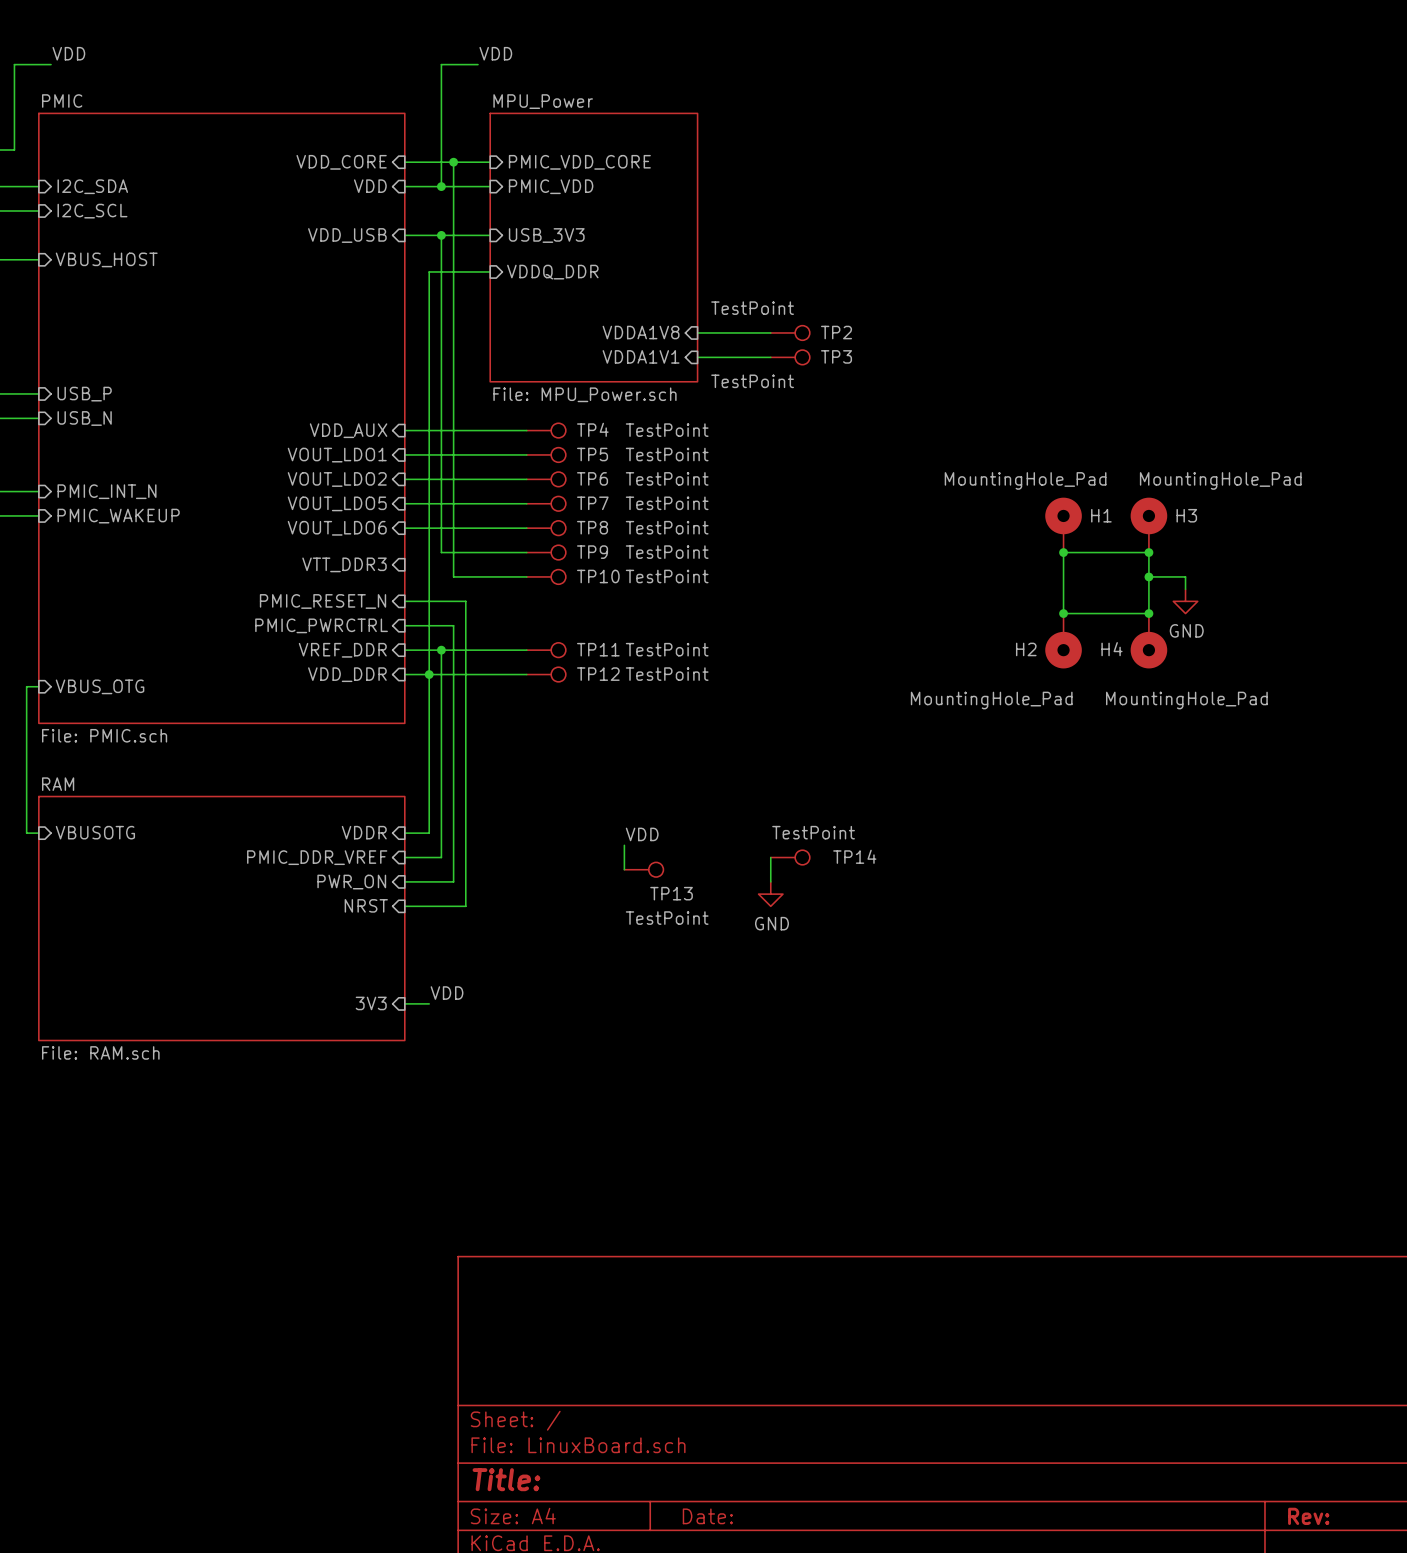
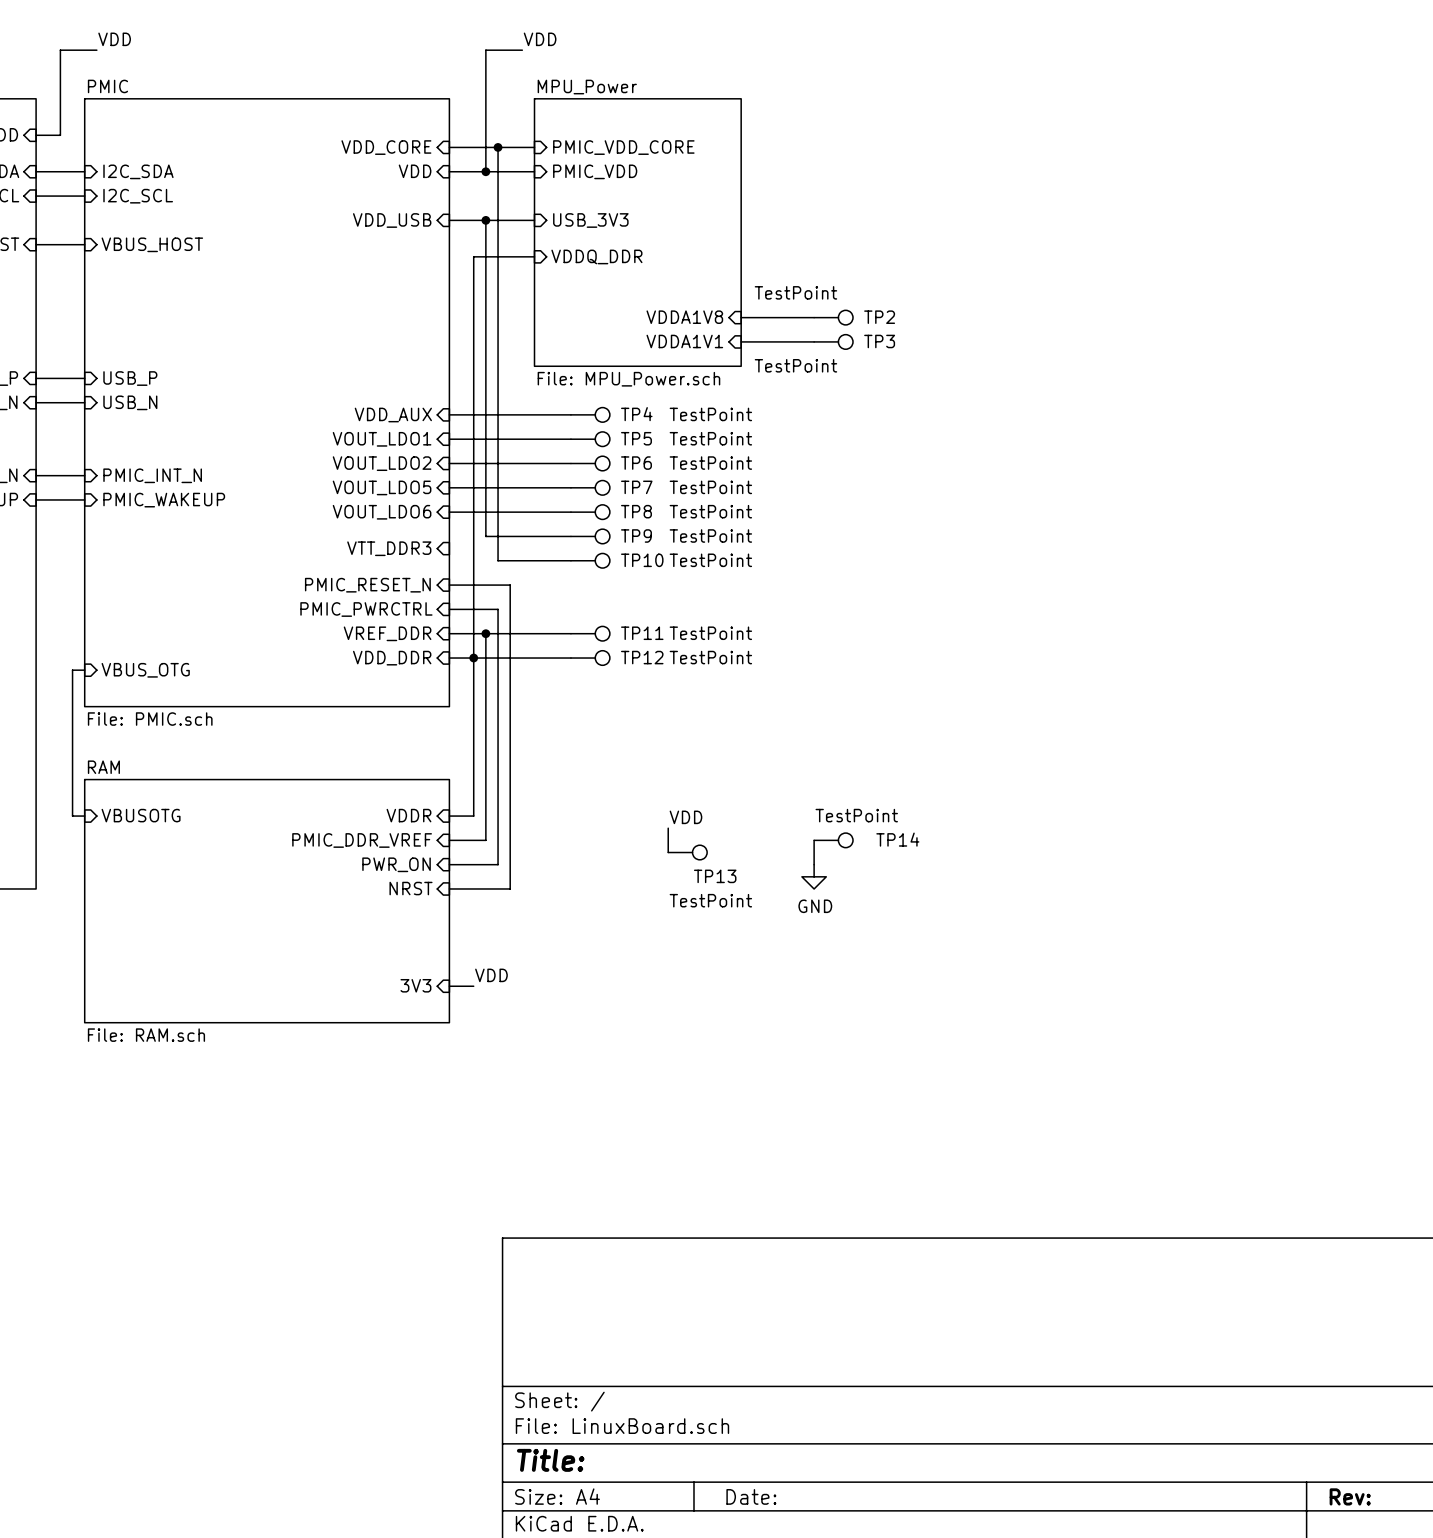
H1: MountingHole_Pad (1063, 525) -> none
H3: MountingHole_Pad (1148, 525) -> none
wire: (1063, 552) (1148, 552) (1148, 613) (1063, 613) (1063, 552) -> none
junction: (1063, 552) -> none
junction: (1148, 552) -> none
wire: (1148, 576) (1185, 576) (1185, 589) -> none
junction: (1148, 576) -> none
power symbol: GND (1185, 601) -> none
junction: (1063, 613) -> none
junction: (1148, 613) -> none
H2: MountingHole_Pad (1063, 641) -> none
H4: MountingHole_Pad (1148, 641) -> none

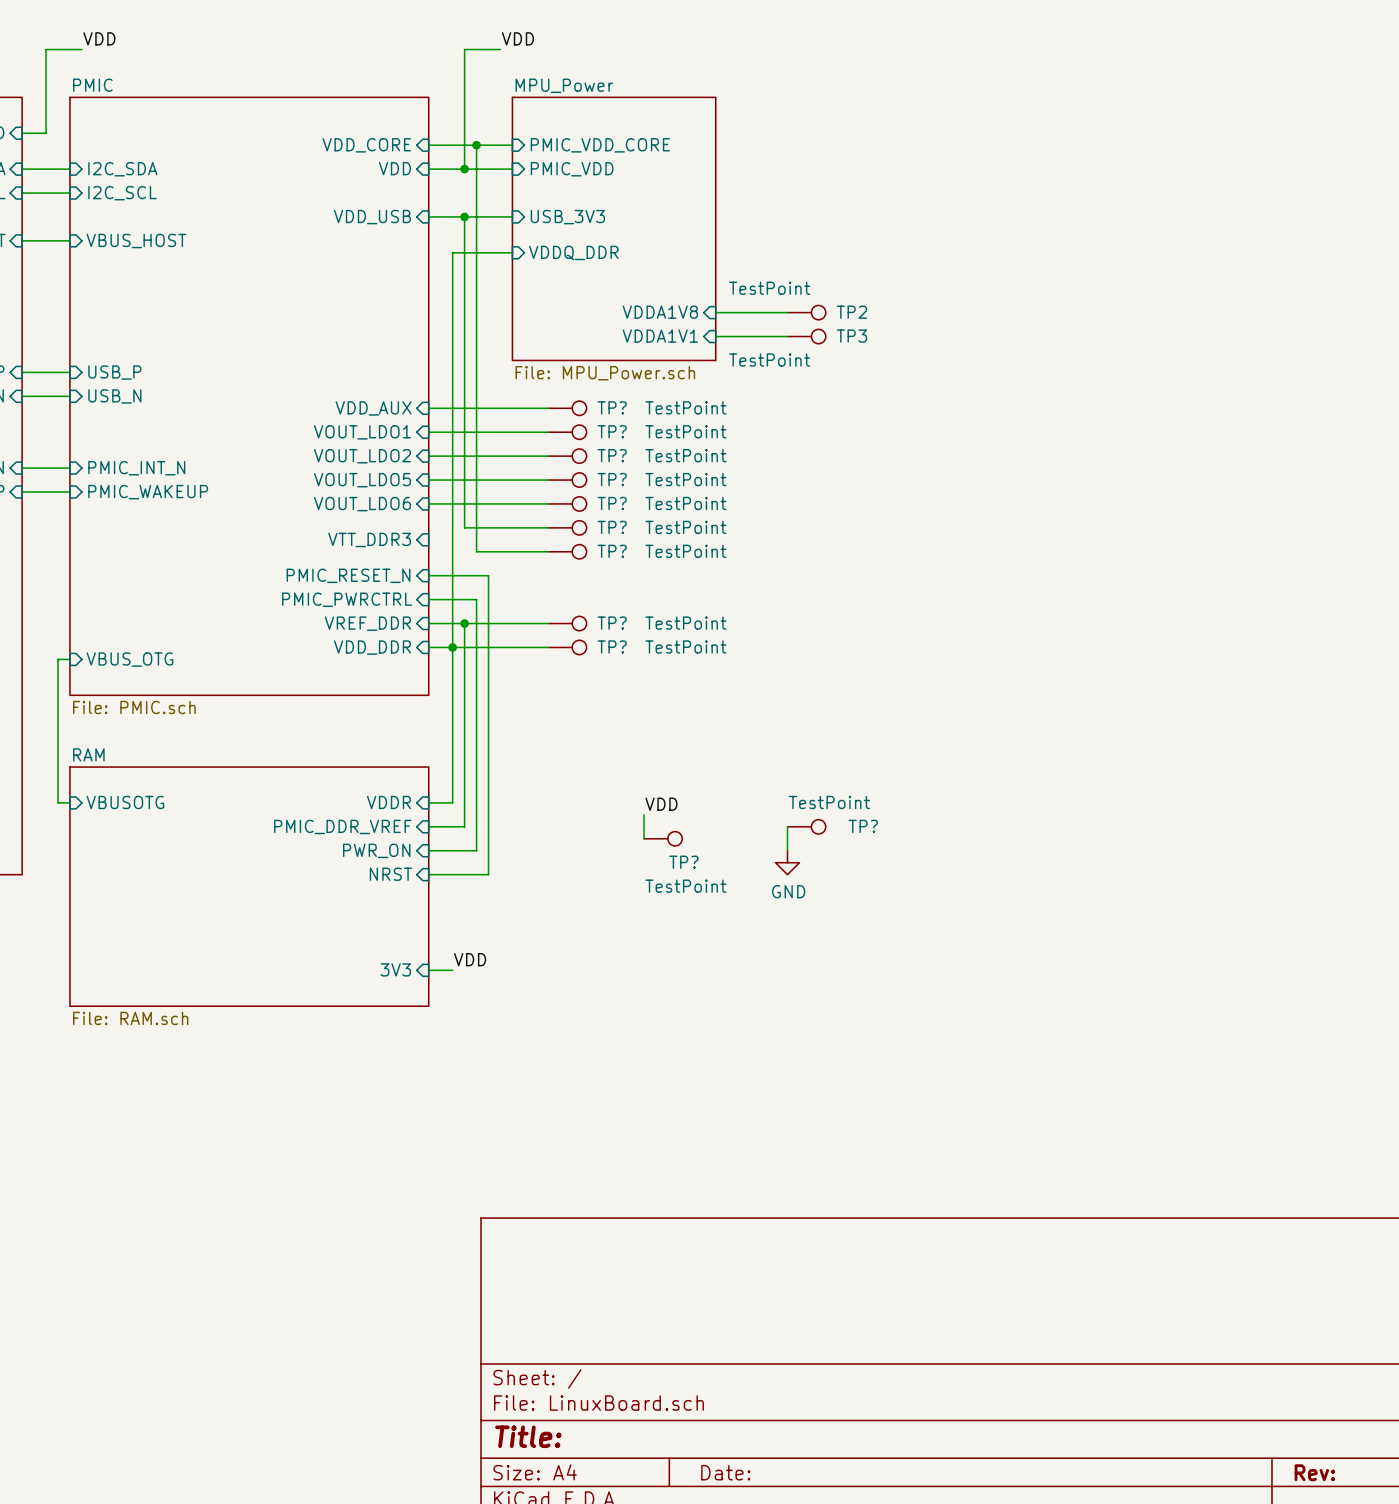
TP4 name: TP4 (636, 414) -> TP? (612, 407)
TP5 name: TP5 (636, 438) -> TP? (612, 431)
TP6 name: TP6 (636, 463) -> TP? (612, 455)
TP7 name: TP7 (636, 487) -> TP? (612, 479)
TP8 name: TP8 (636, 511) -> TP? (612, 503)
TP9 name: TP9 (636, 535) -> TP? (612, 527)
TP10 name: TP10 (642, 560) -> TP? (612, 551)
TP11 name: TP11 (642, 633) -> TP? (612, 623)
TP12 name: TP12 (642, 657) -> TP? (612, 647)
TP14 name: TP14 (897, 839) -> TP? (863, 826)
TP13 name: TP13 (715, 876) -> TP? (683, 862)

